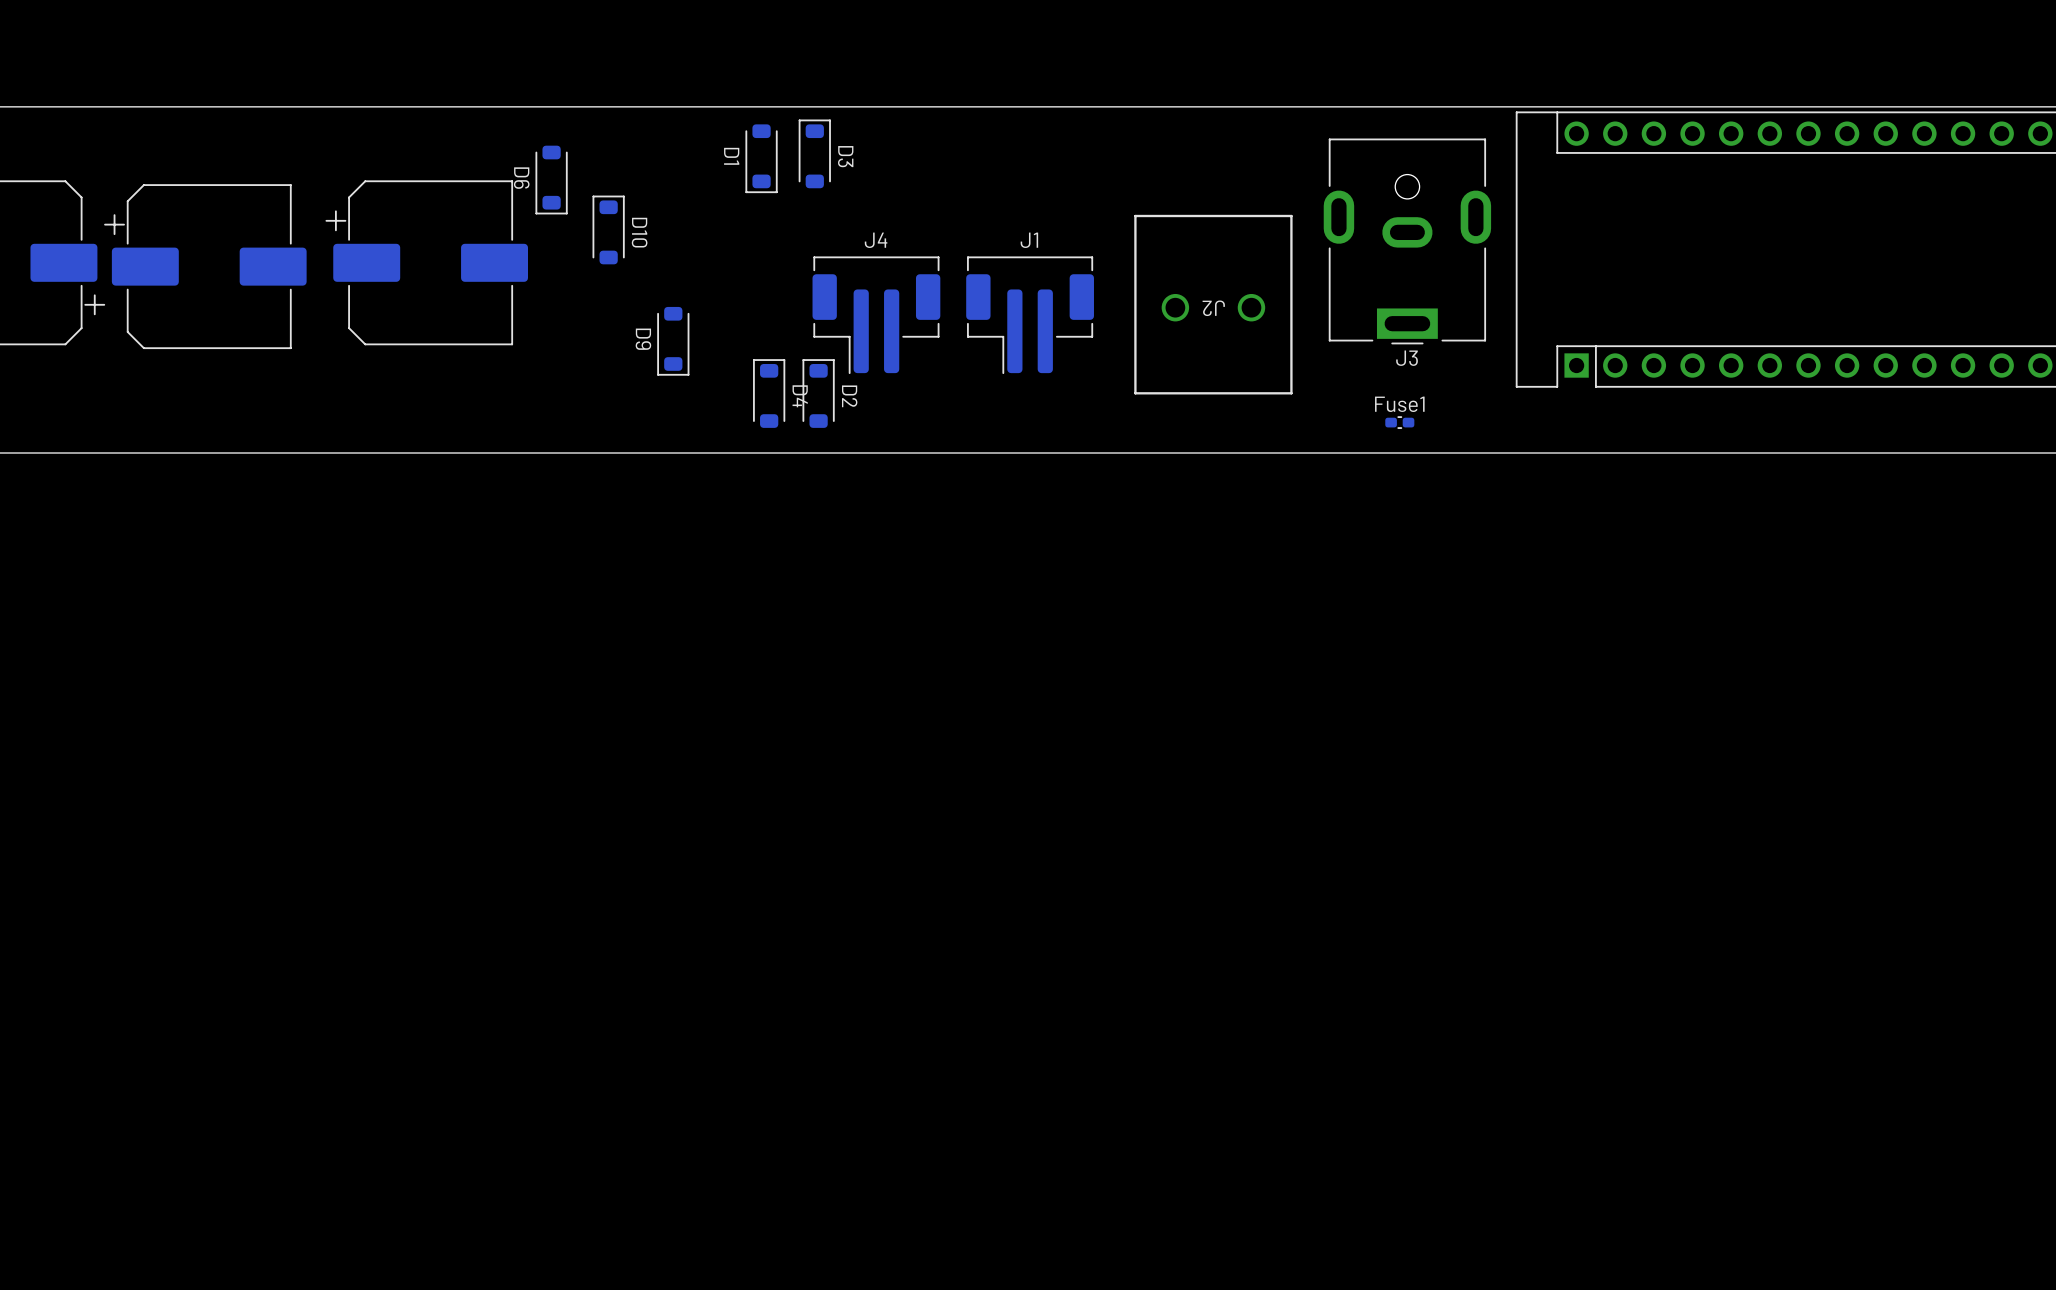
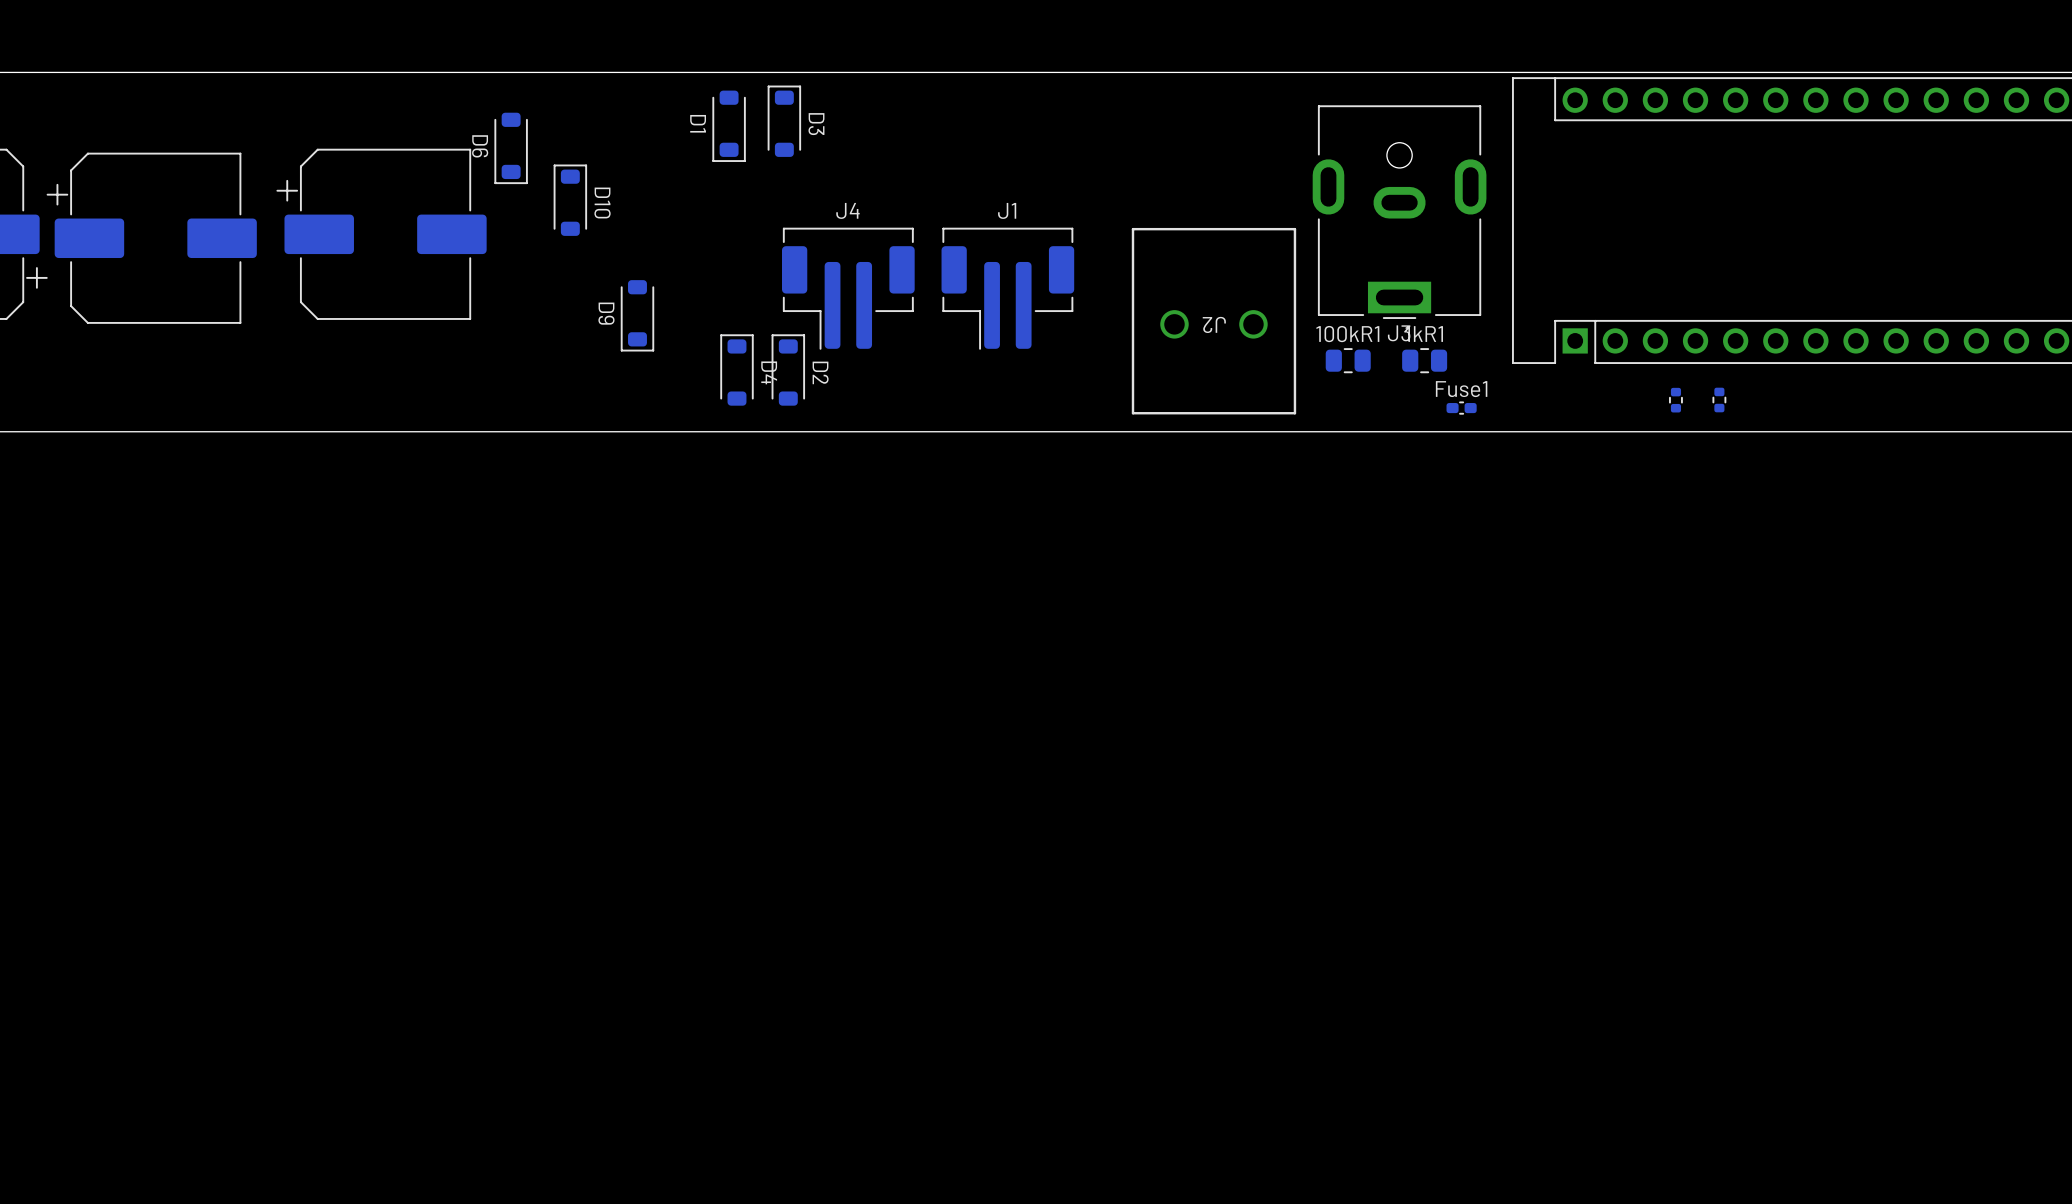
J2 position: (1213, 304) -> (1213, 321)
100kR1: none -> (1348, 360)
1kR1: none -> (1424, 360)
Fuse1 position: (1399, 422) -> (1461, 408)
part: none -> (1675, 400)
part: none -> (1719, 400)

